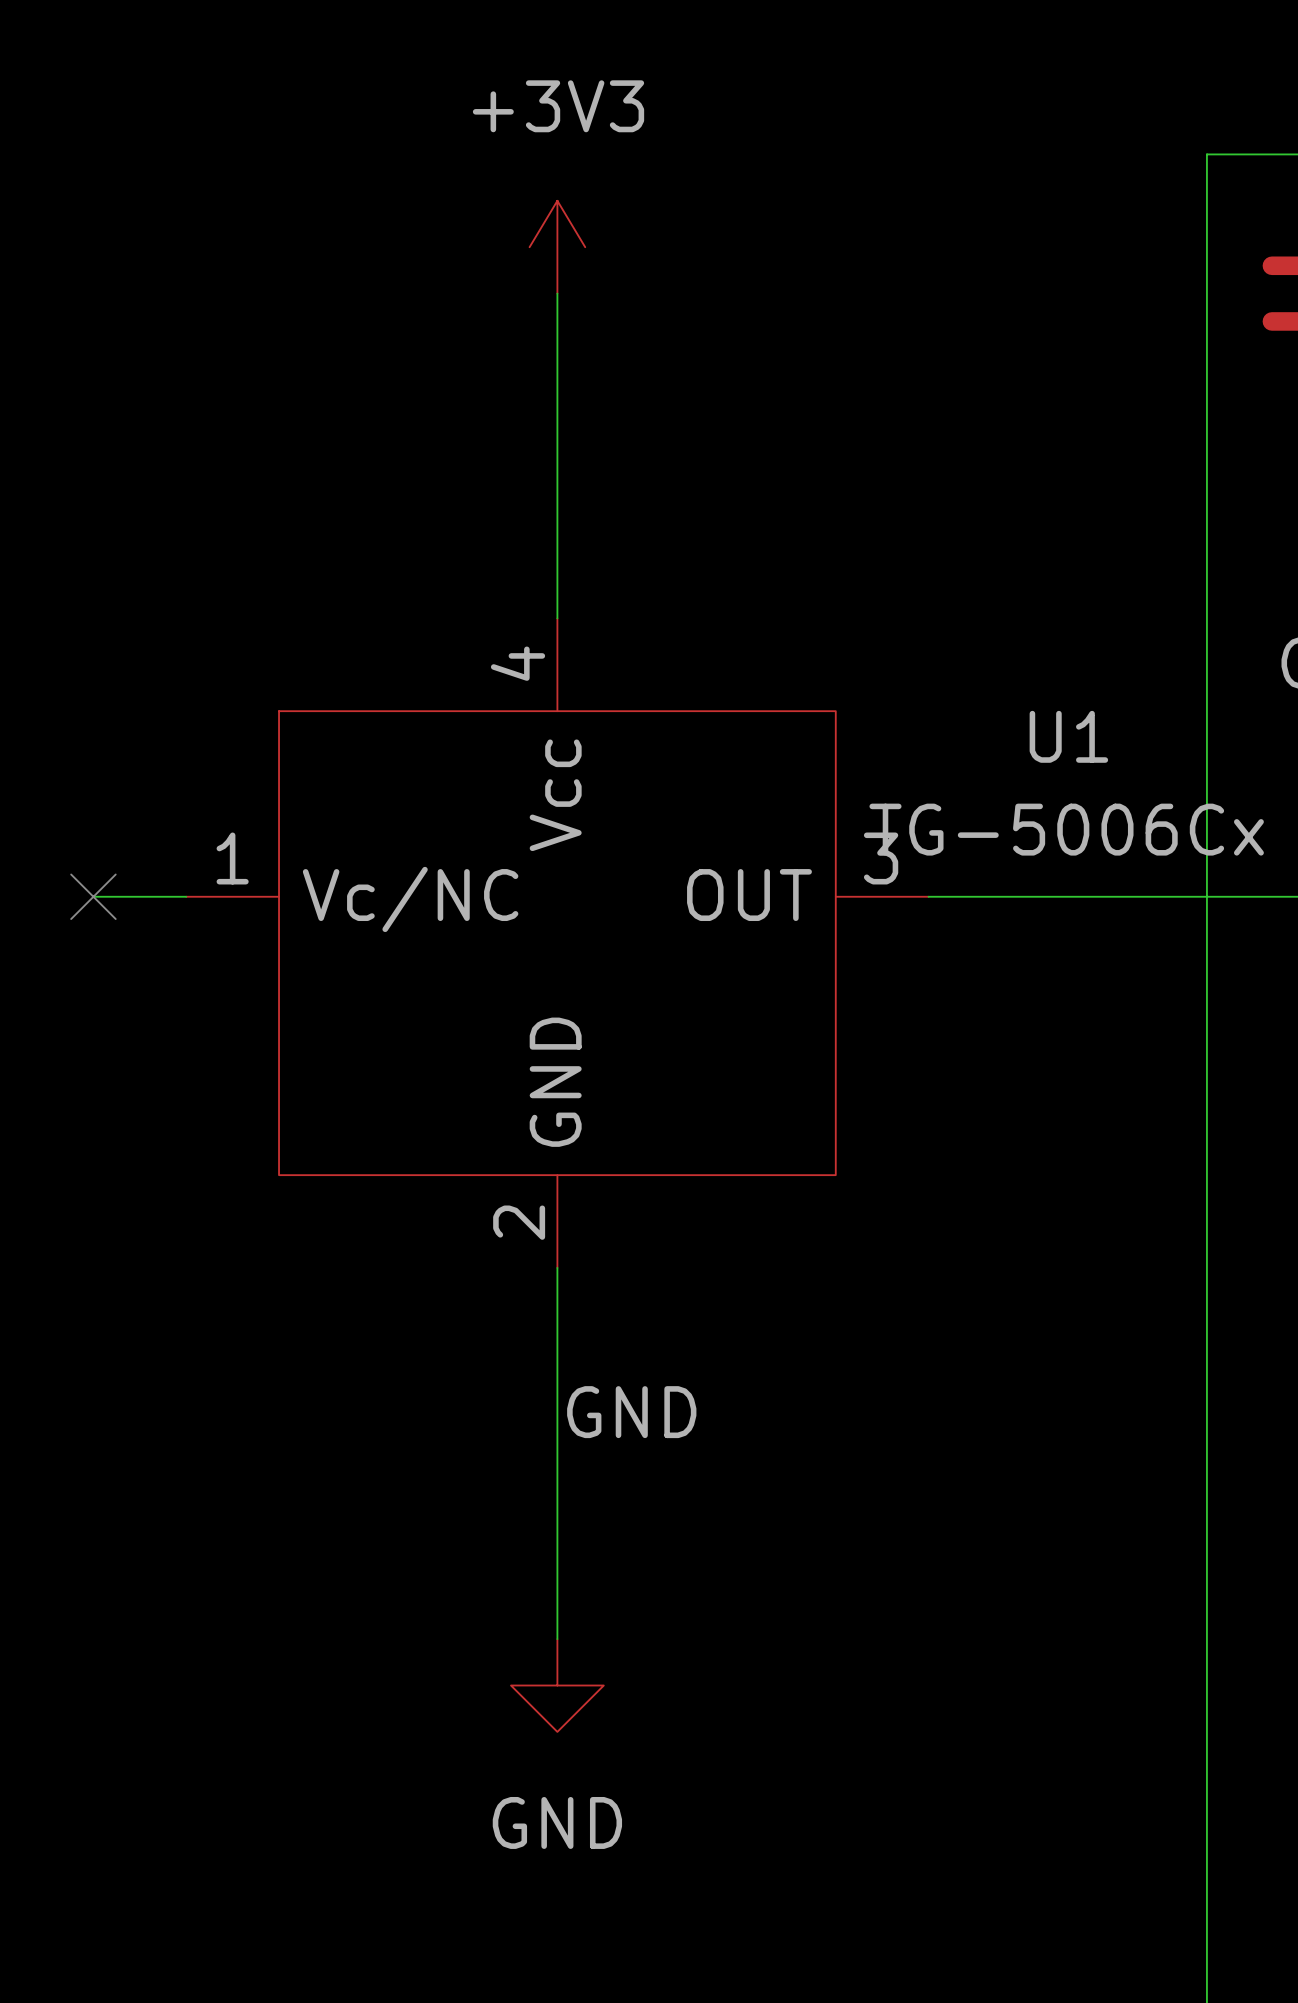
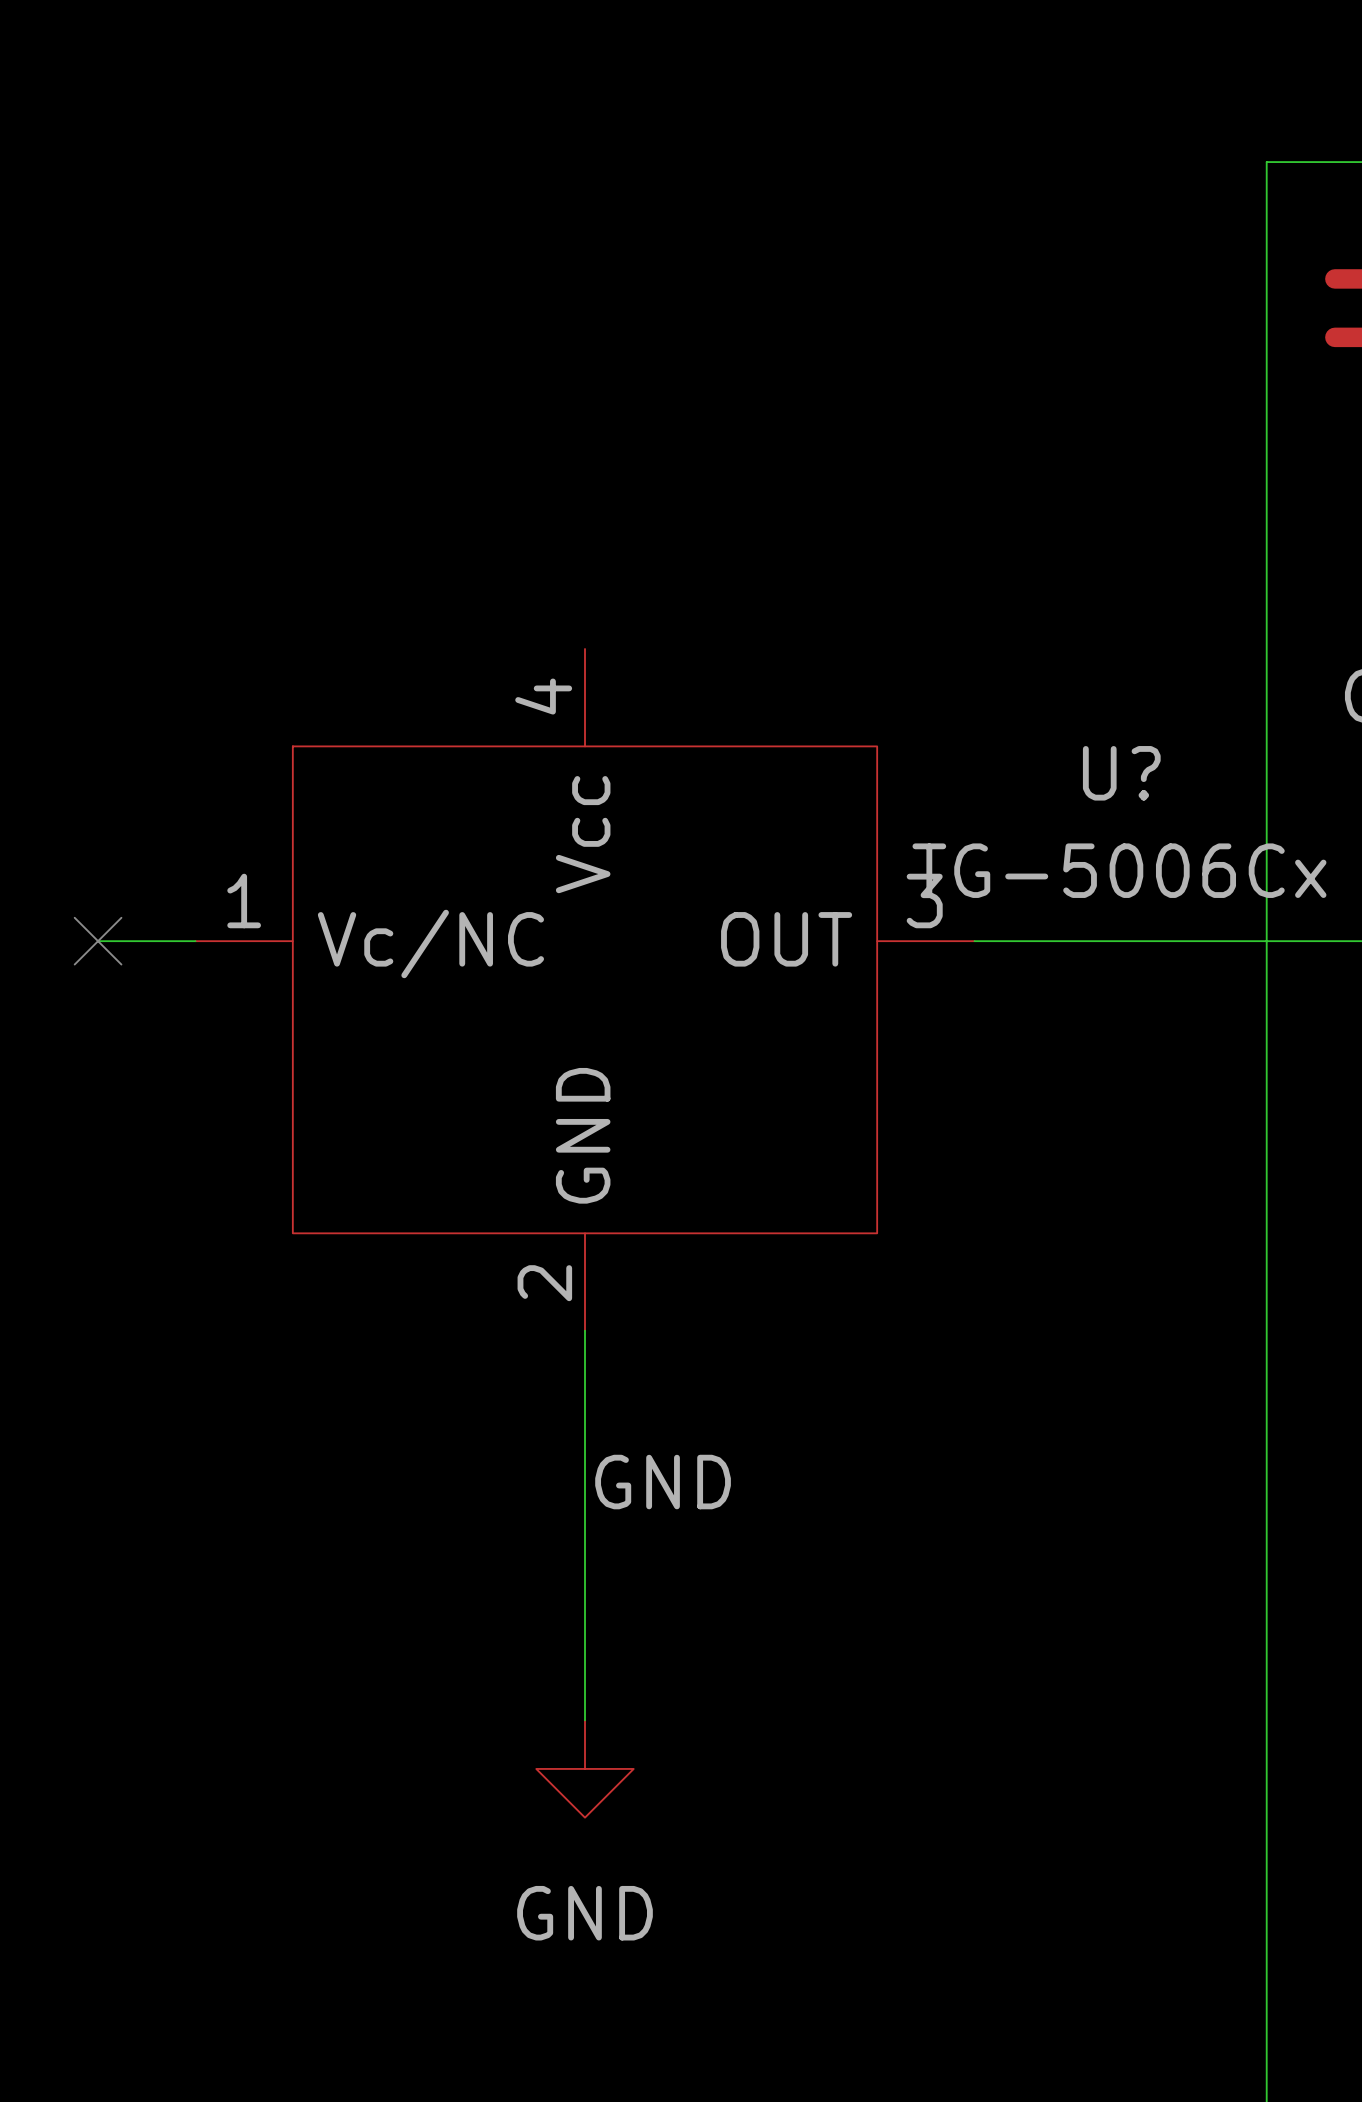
power symbol: +3V3 (557, 247) -> none
wire: (557, 293) (557, 618) -> none
U1 name: U1 (1068, 736) -> U? (1121, 773)

